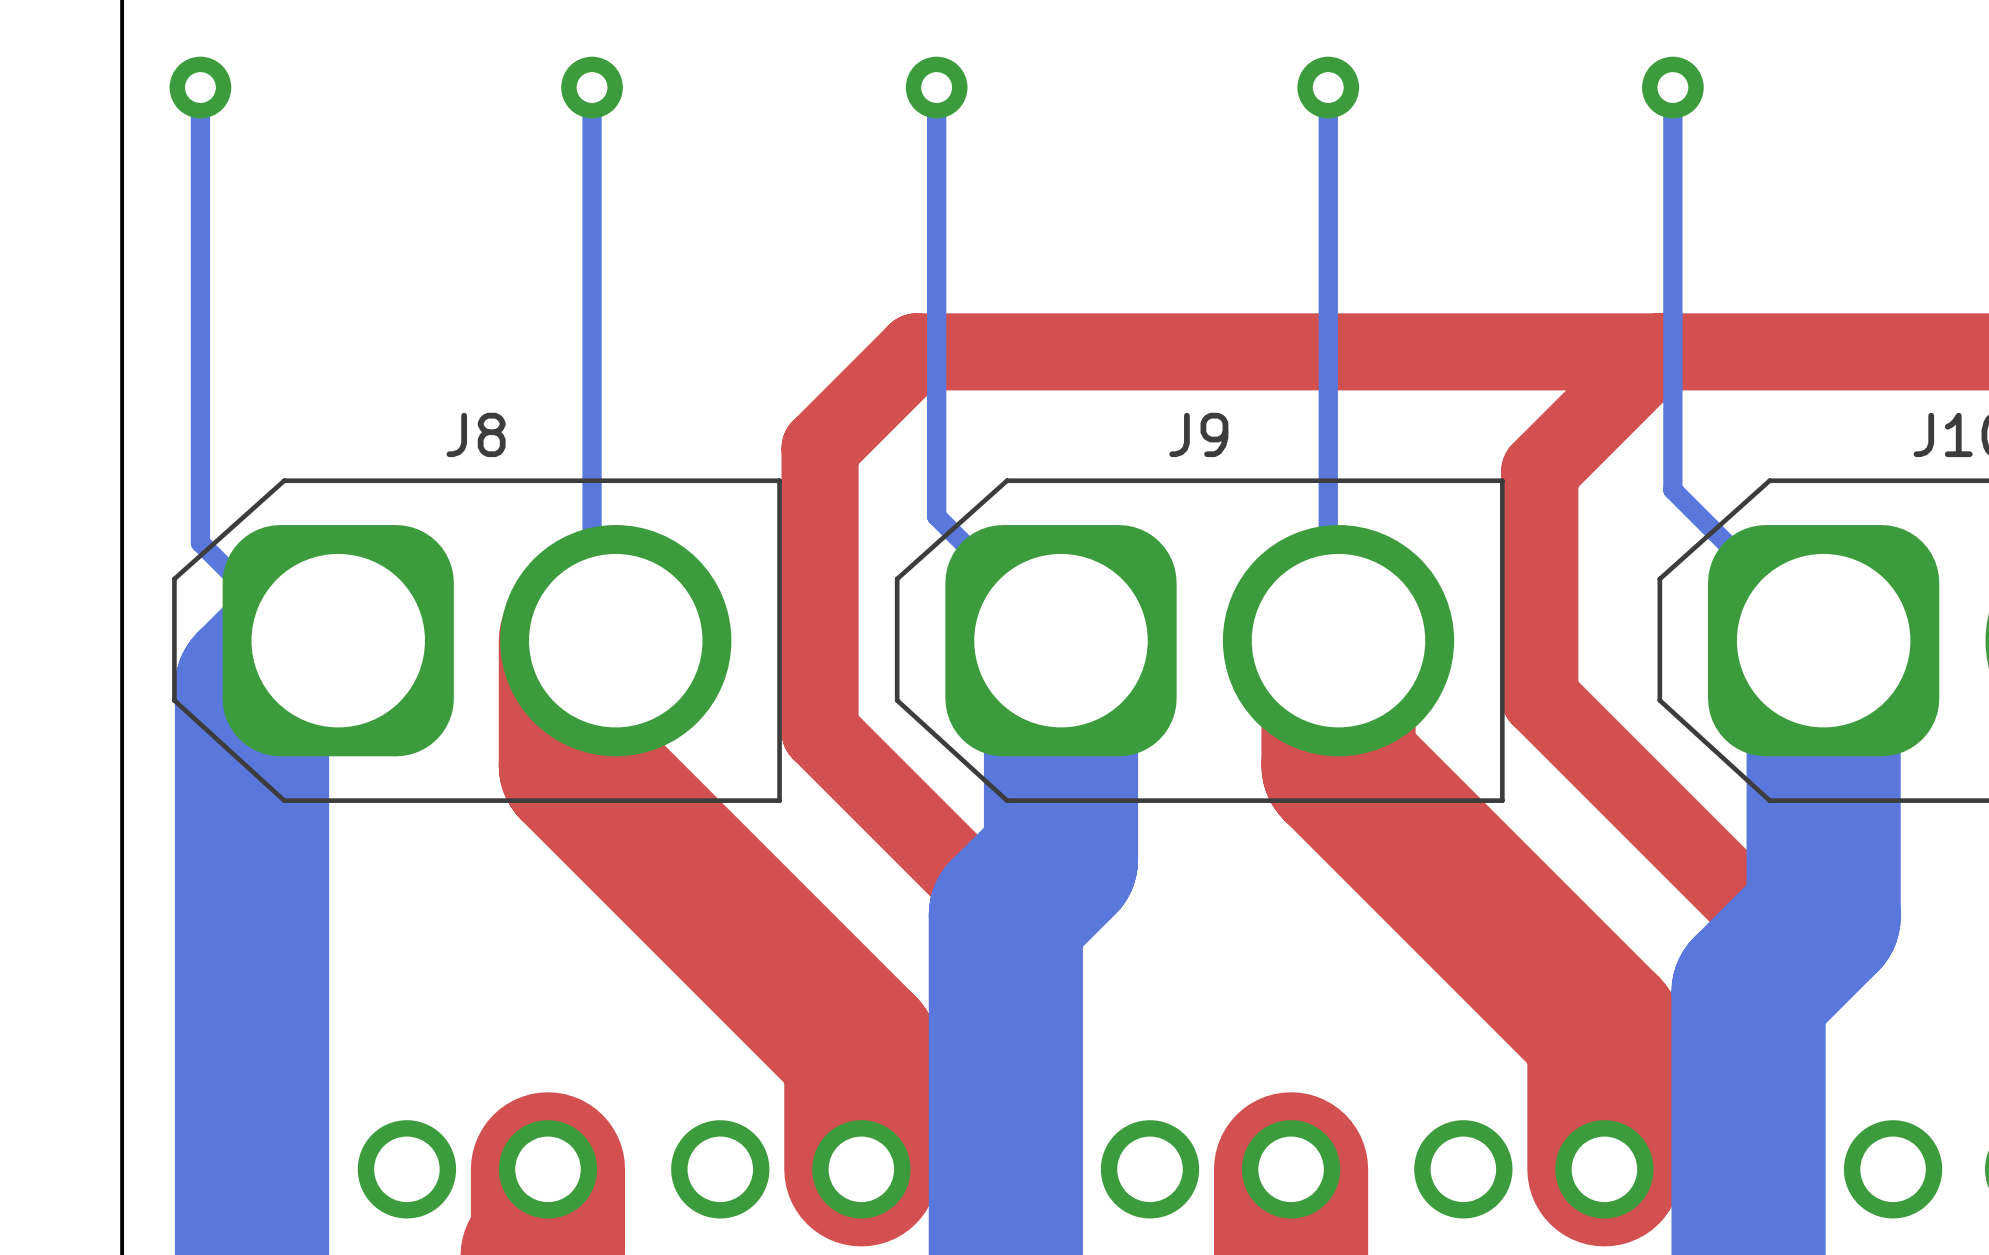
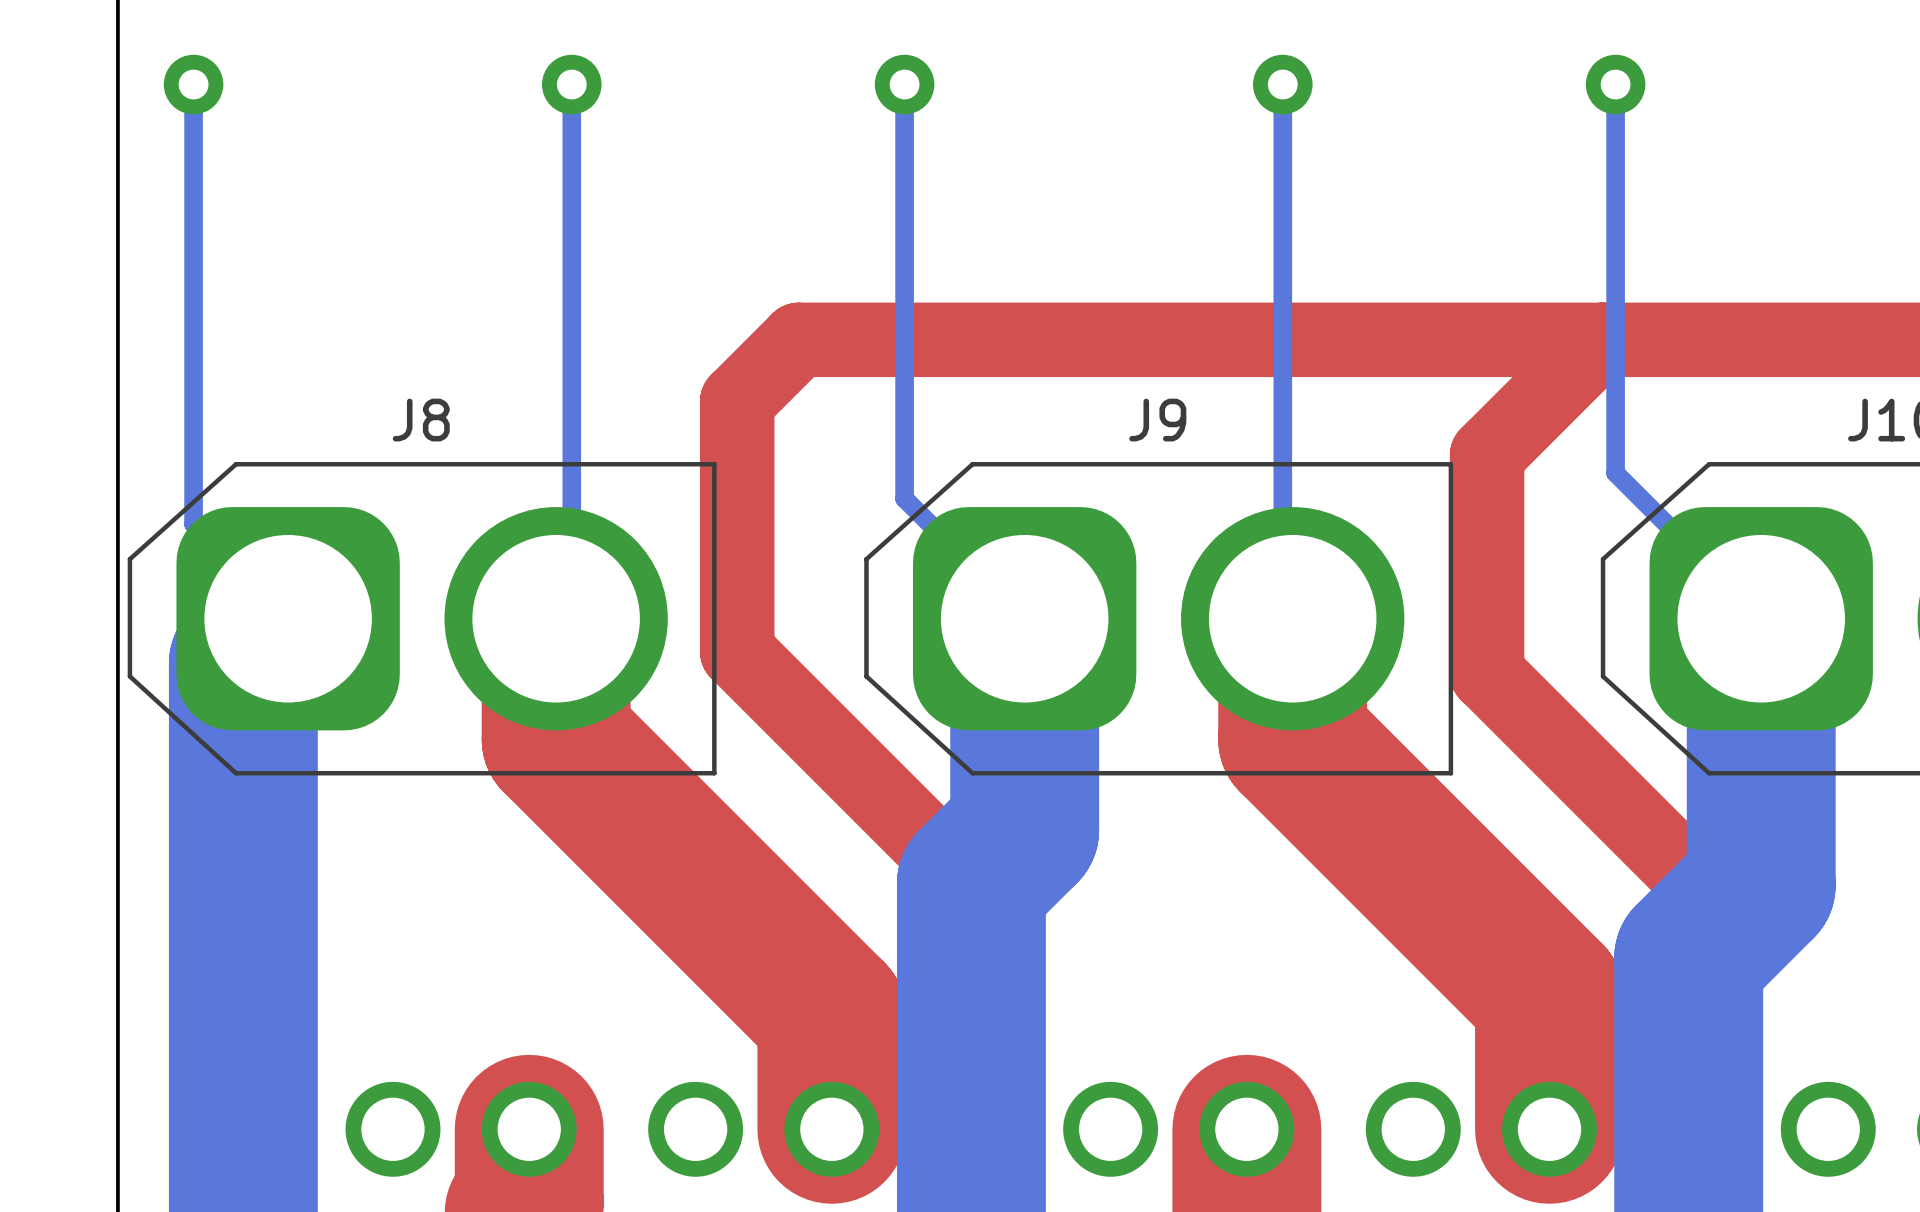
top track: (916, 351) (820, 448) (820, 731) -> (885, 339) (798, 339) (737, 401) (737, 651) (791, 706)
J8 position: (476, 640) -> (422, 618)

